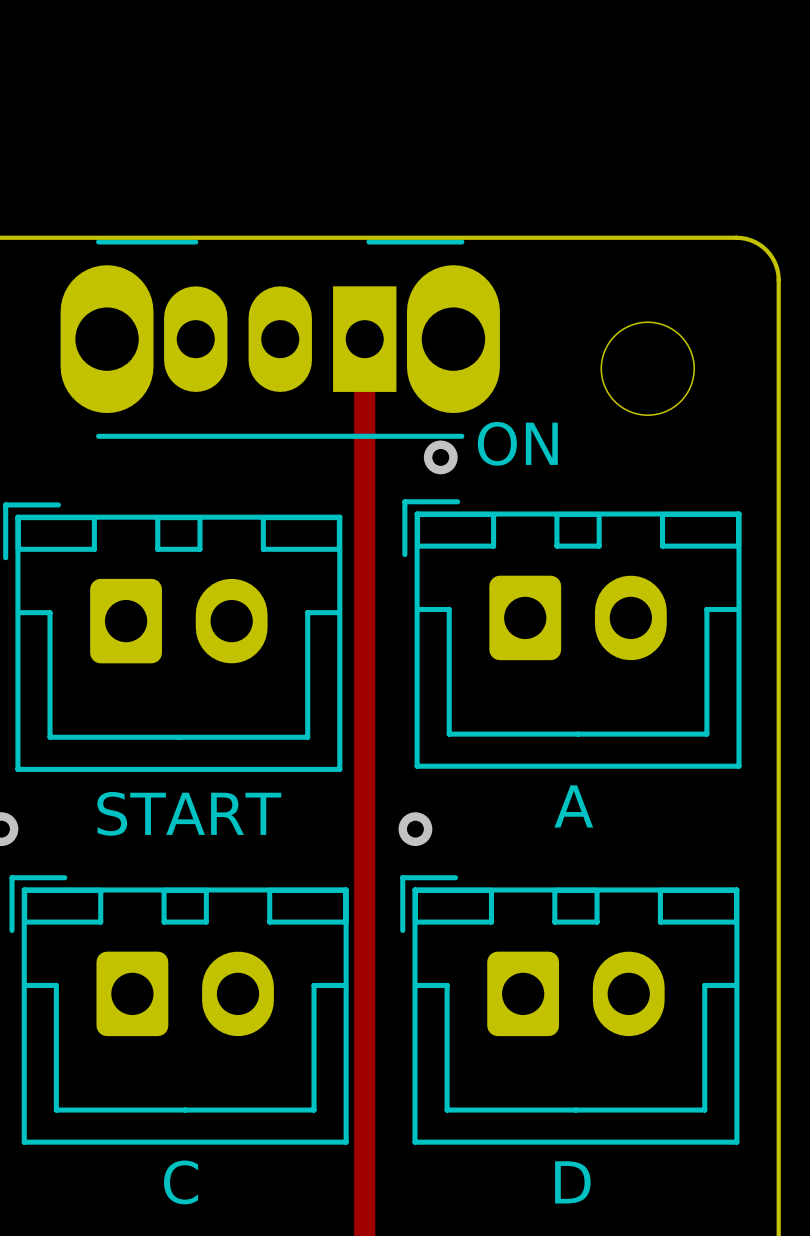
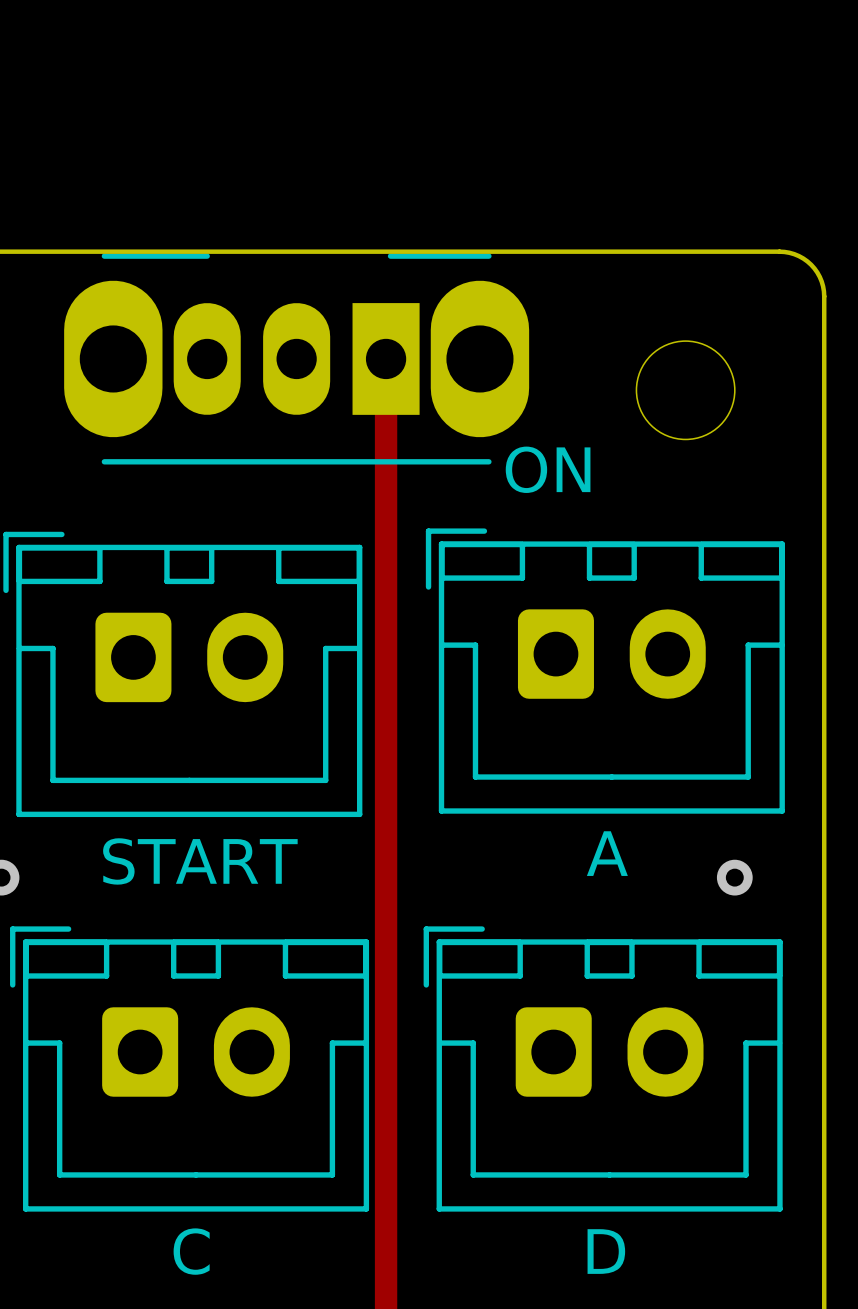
via: (440, 457) -> none
via: (415, 829) -> none
via: none -> (734, 877)

